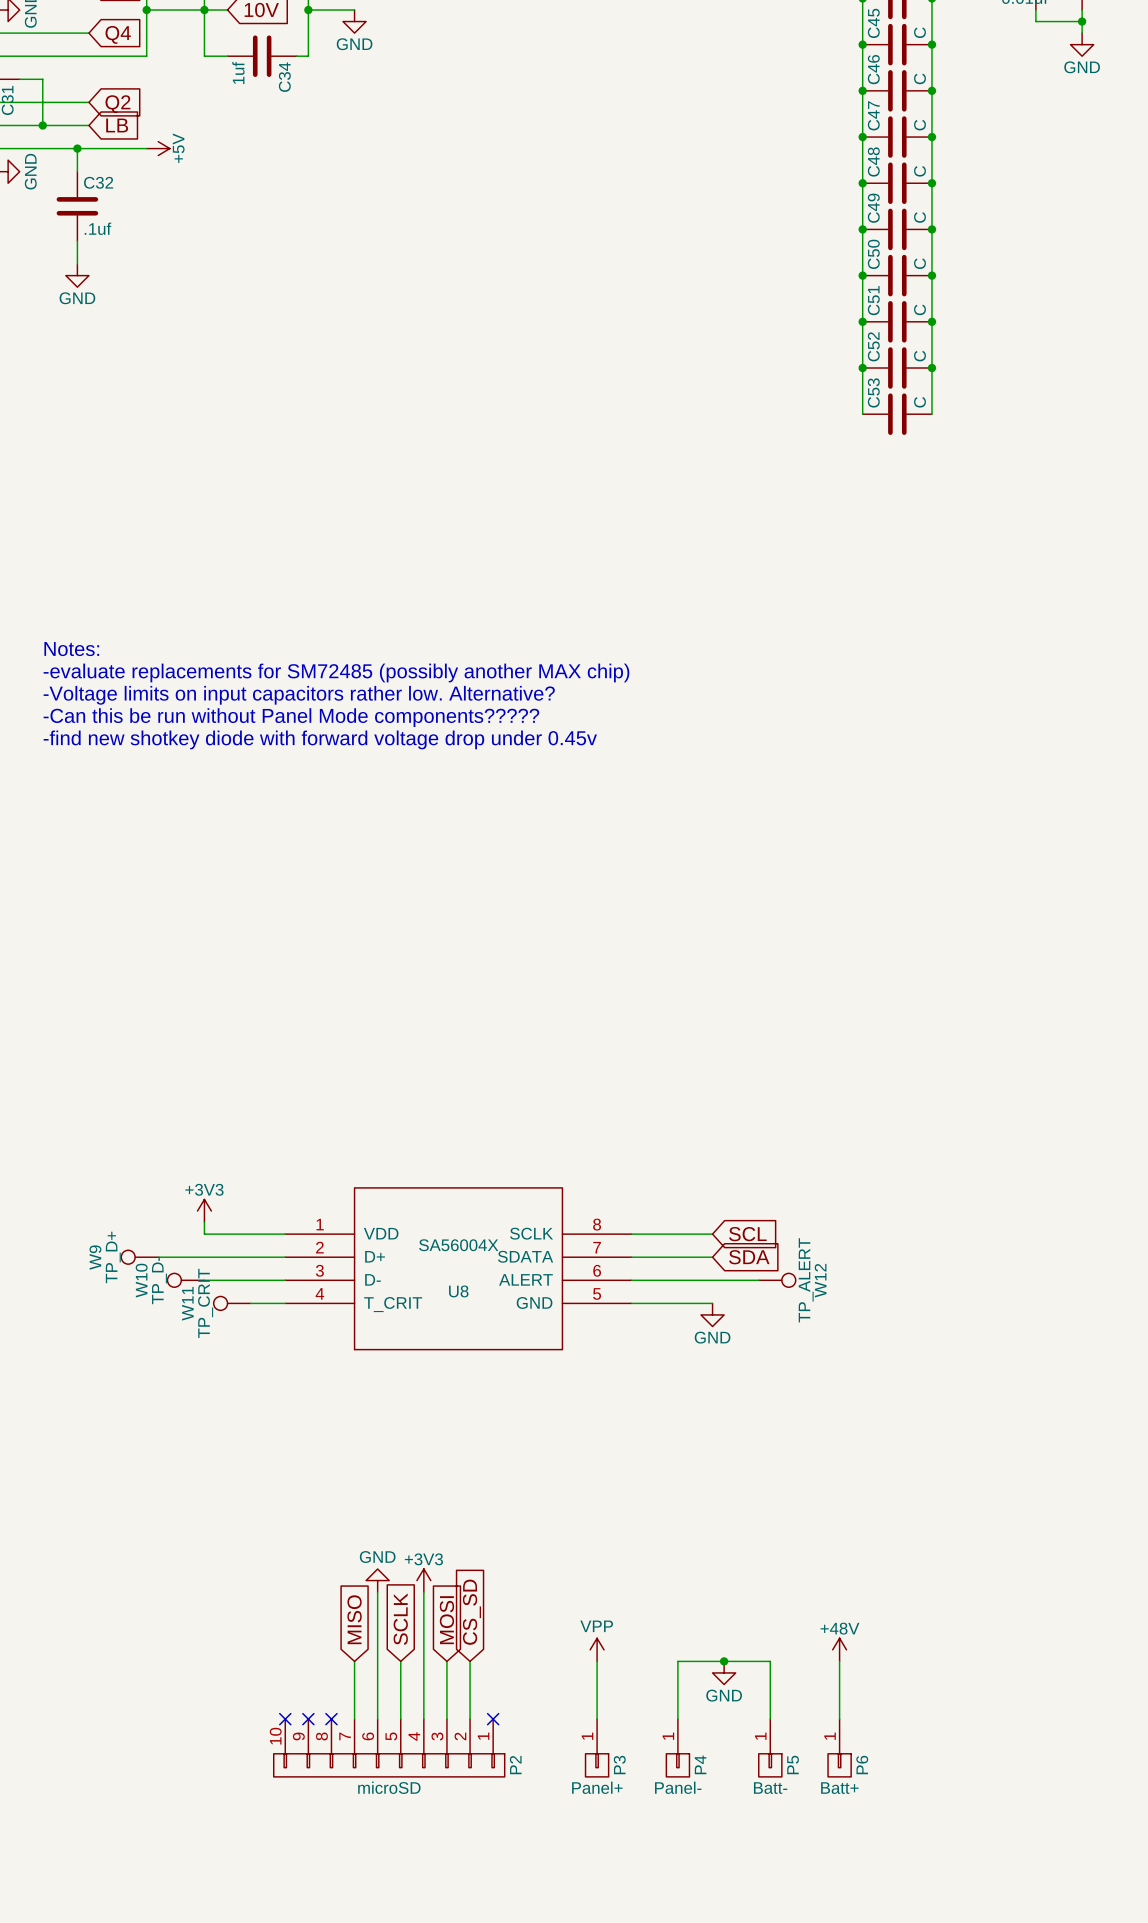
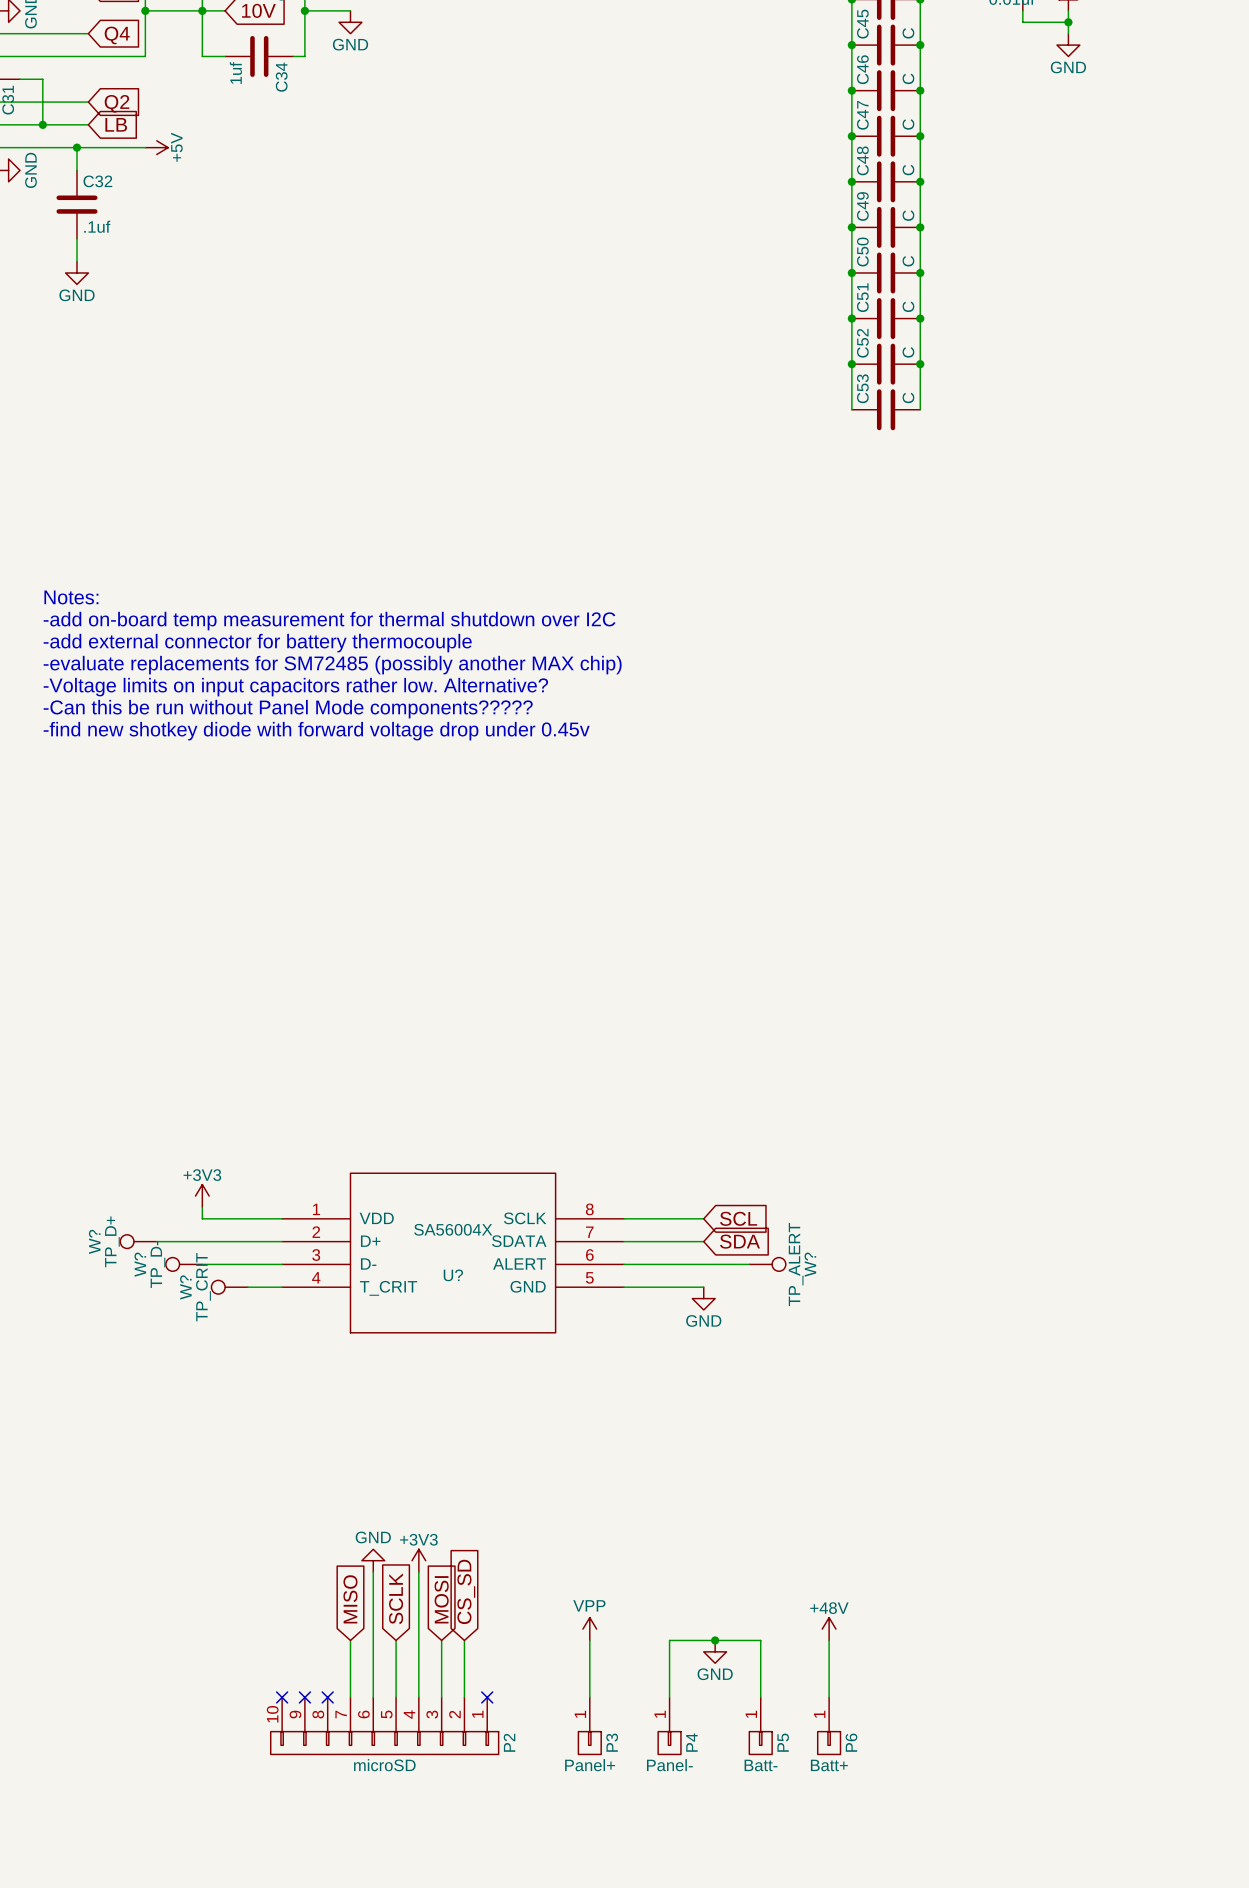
text: none -> Notes: (71, 597)
text: none -> -add on-board temp measurement for thermal shutdown over I2C (329, 621)
text: Notes: (71, 649) -> -add external connector for battery thermocouple (257, 643)
W9 name: W9 (95, 1257) -> W? (94, 1241)
W10 name: W10 (141, 1280) -> W? (140, 1264)
W12 name: W12 (820, 1280) -> W? (810, 1264)
U8 name: U8 (458, 1291) -> U? (453, 1275)
W11 name: W11 (187, 1303) -> W? (185, 1287)

